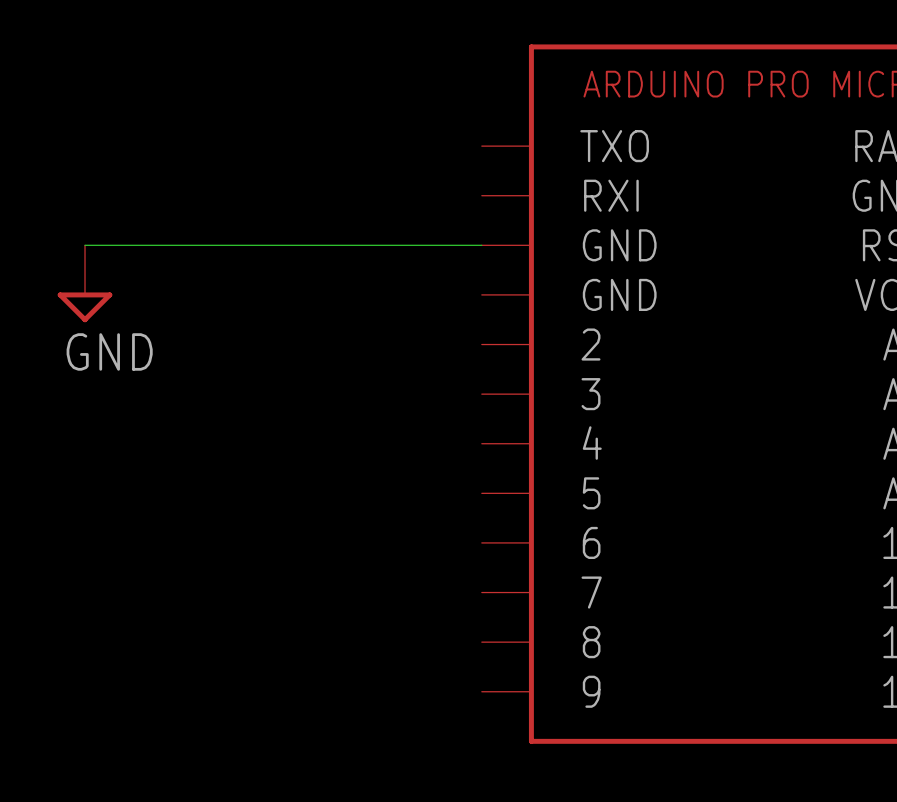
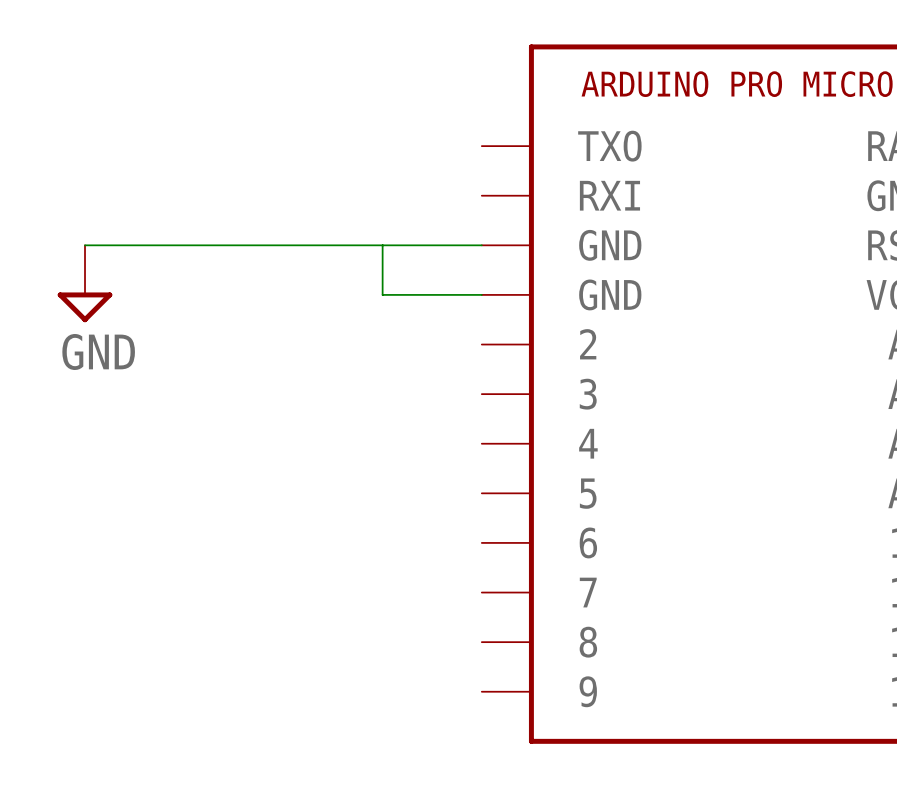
wire: none -> (382, 245) (382, 294) (481, 294)

